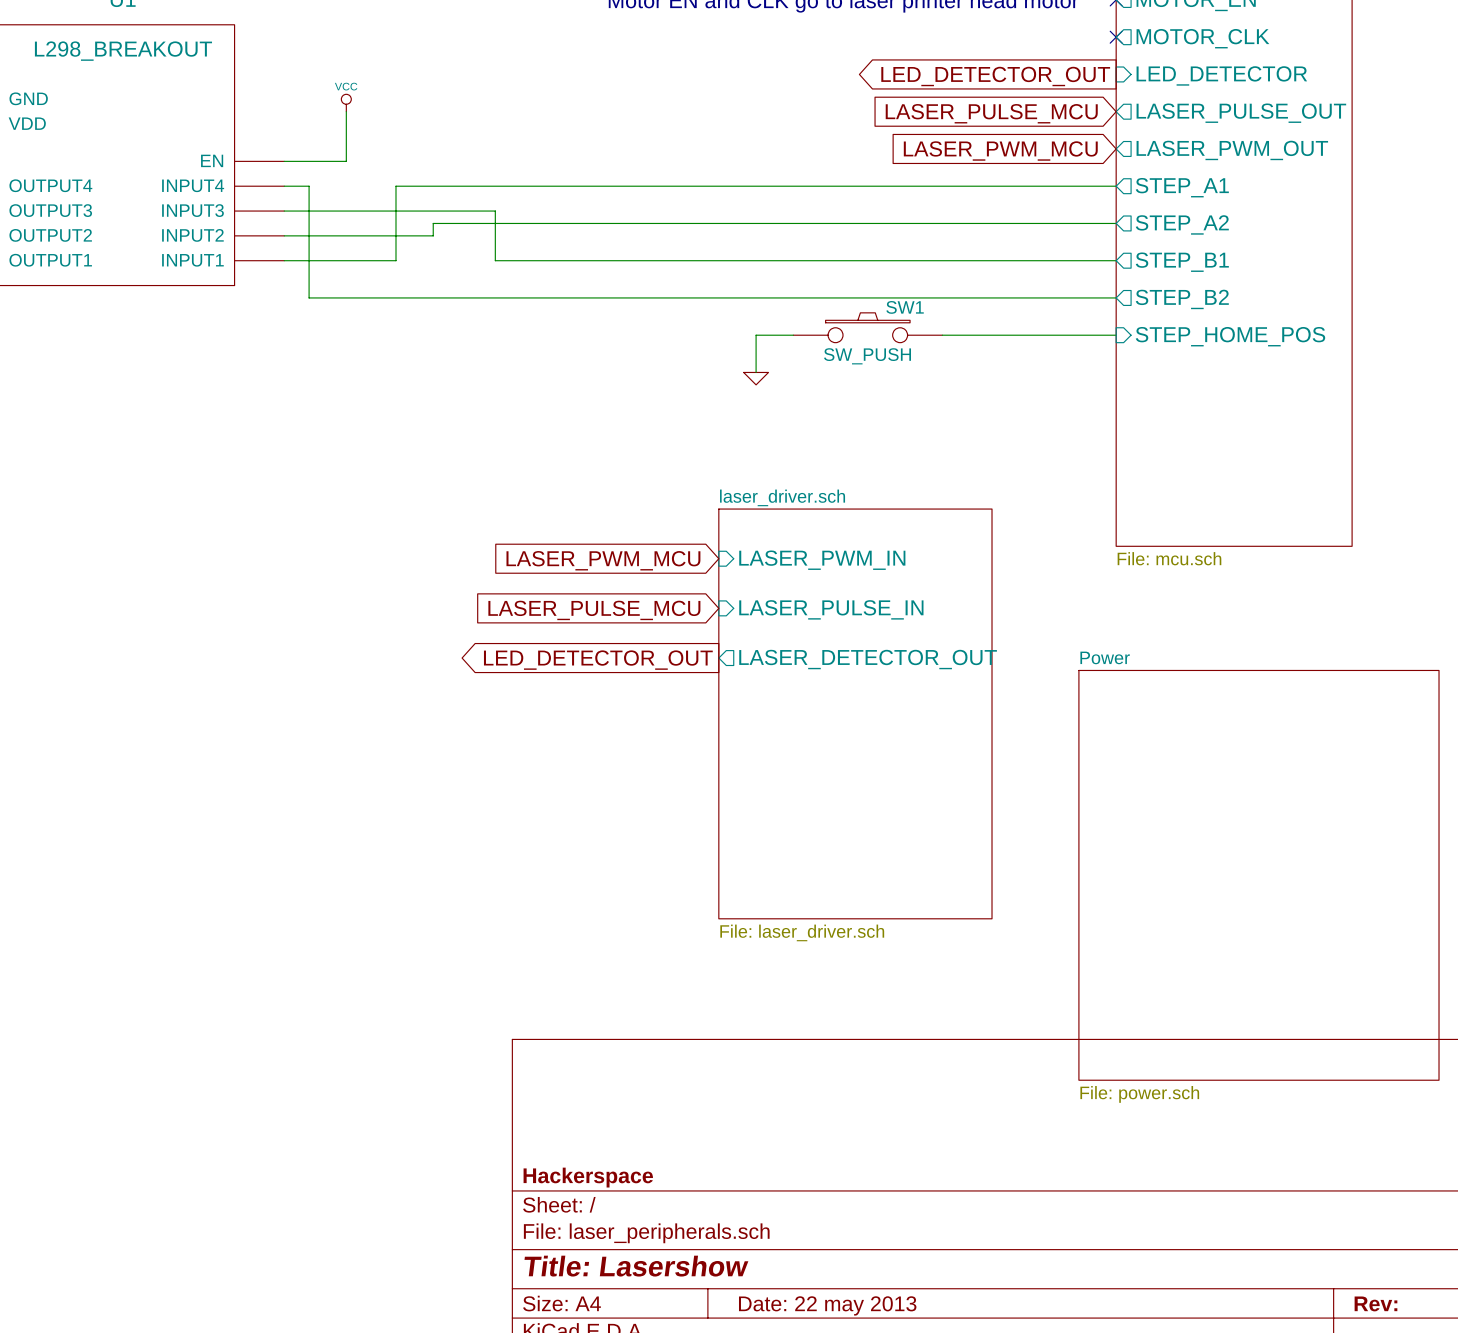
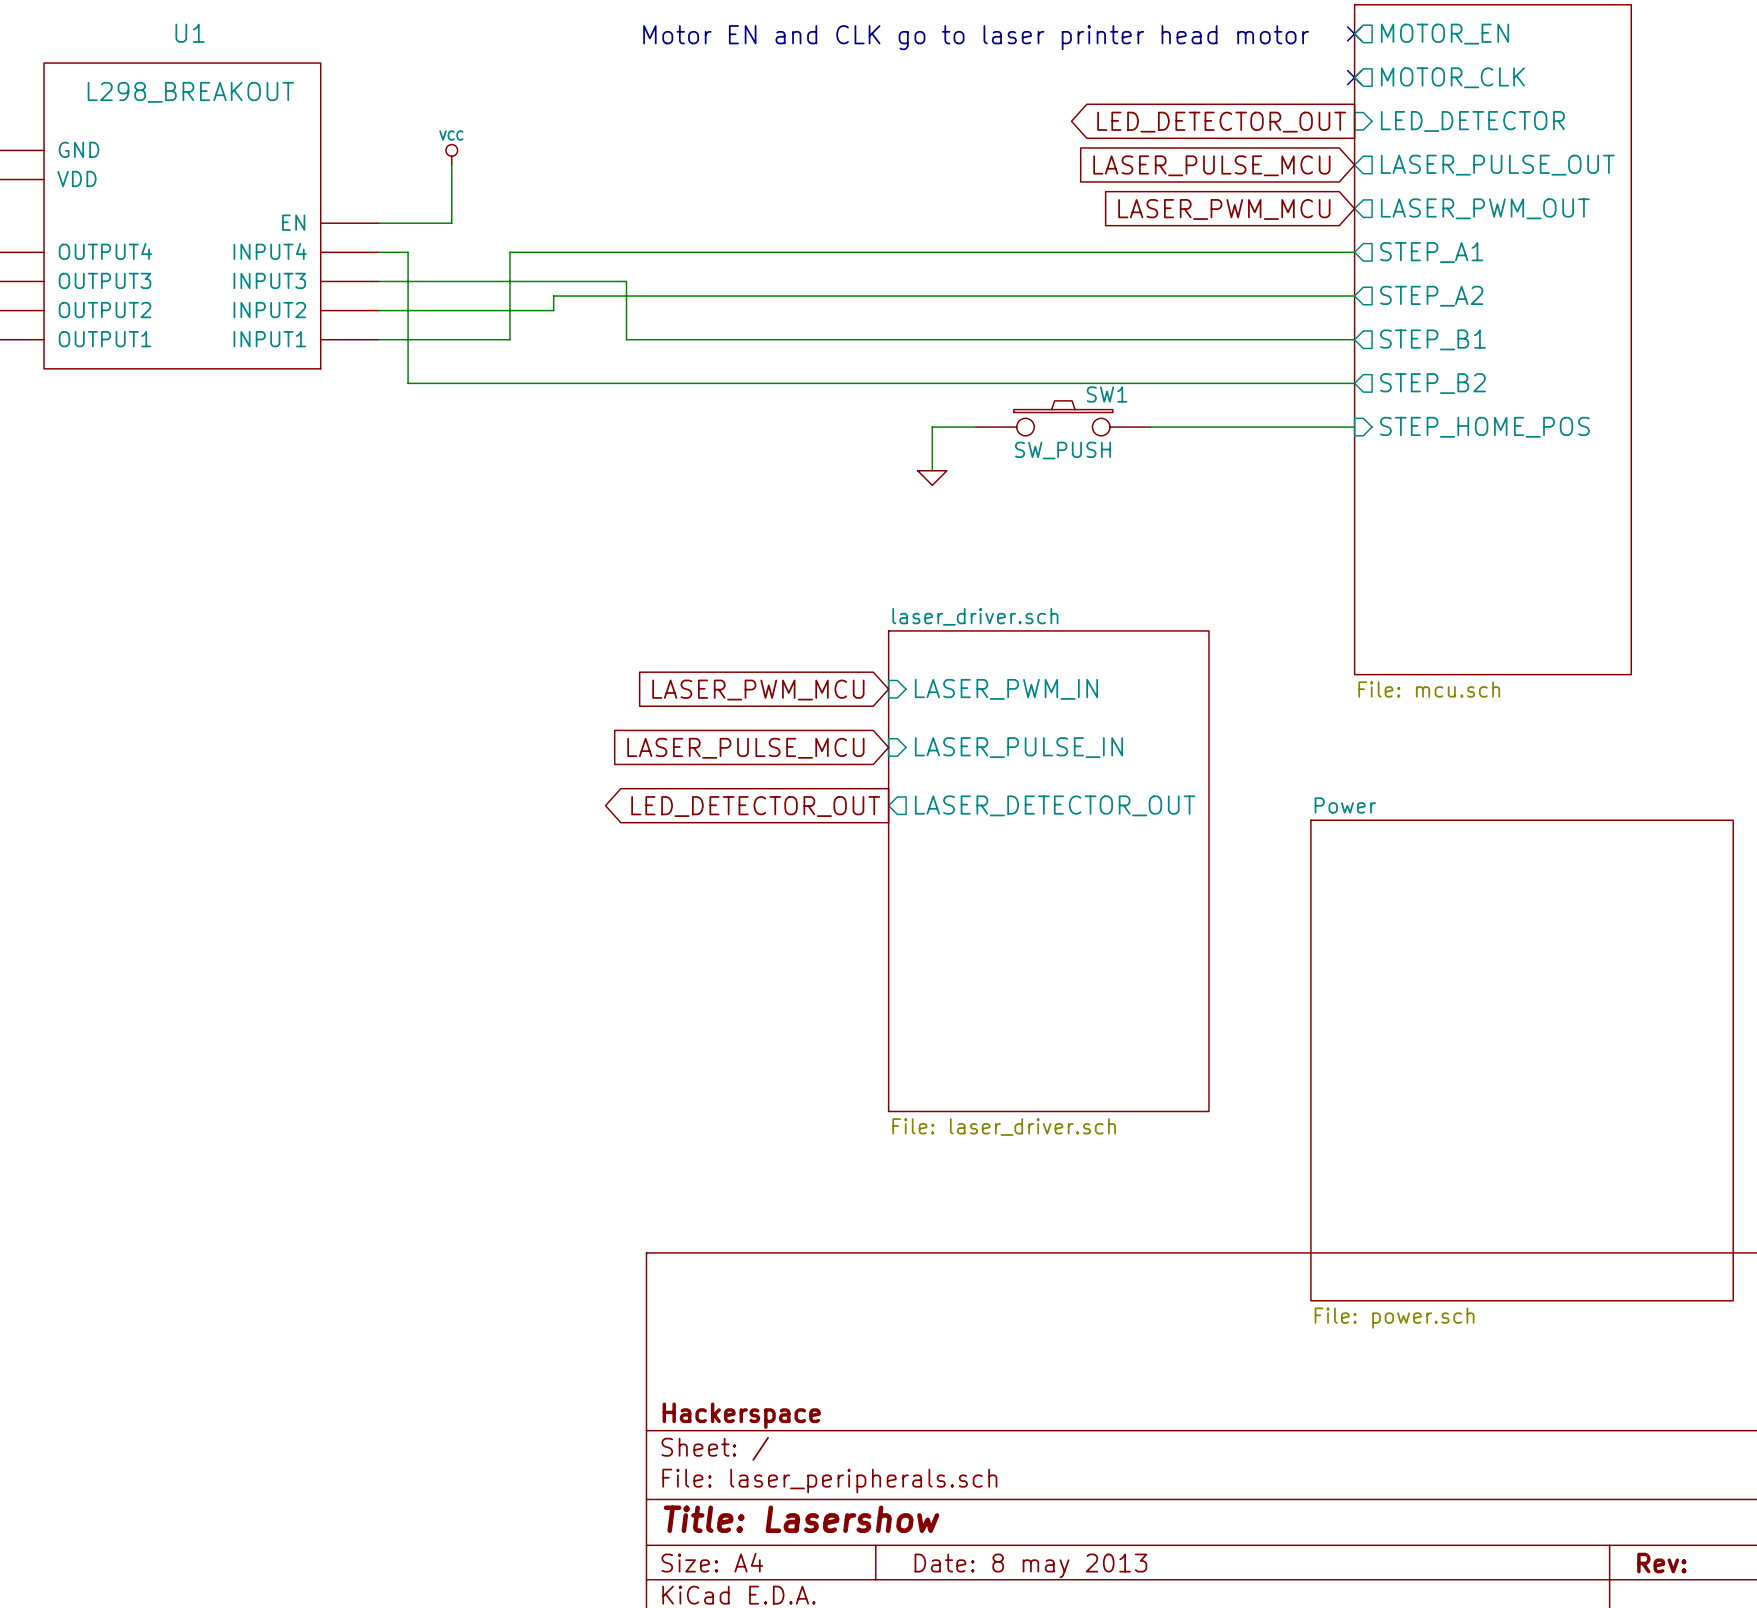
title block: Date: 22 may 2013 (827, 1305) -> Date: 8 may 2013 (1030, 1565)

